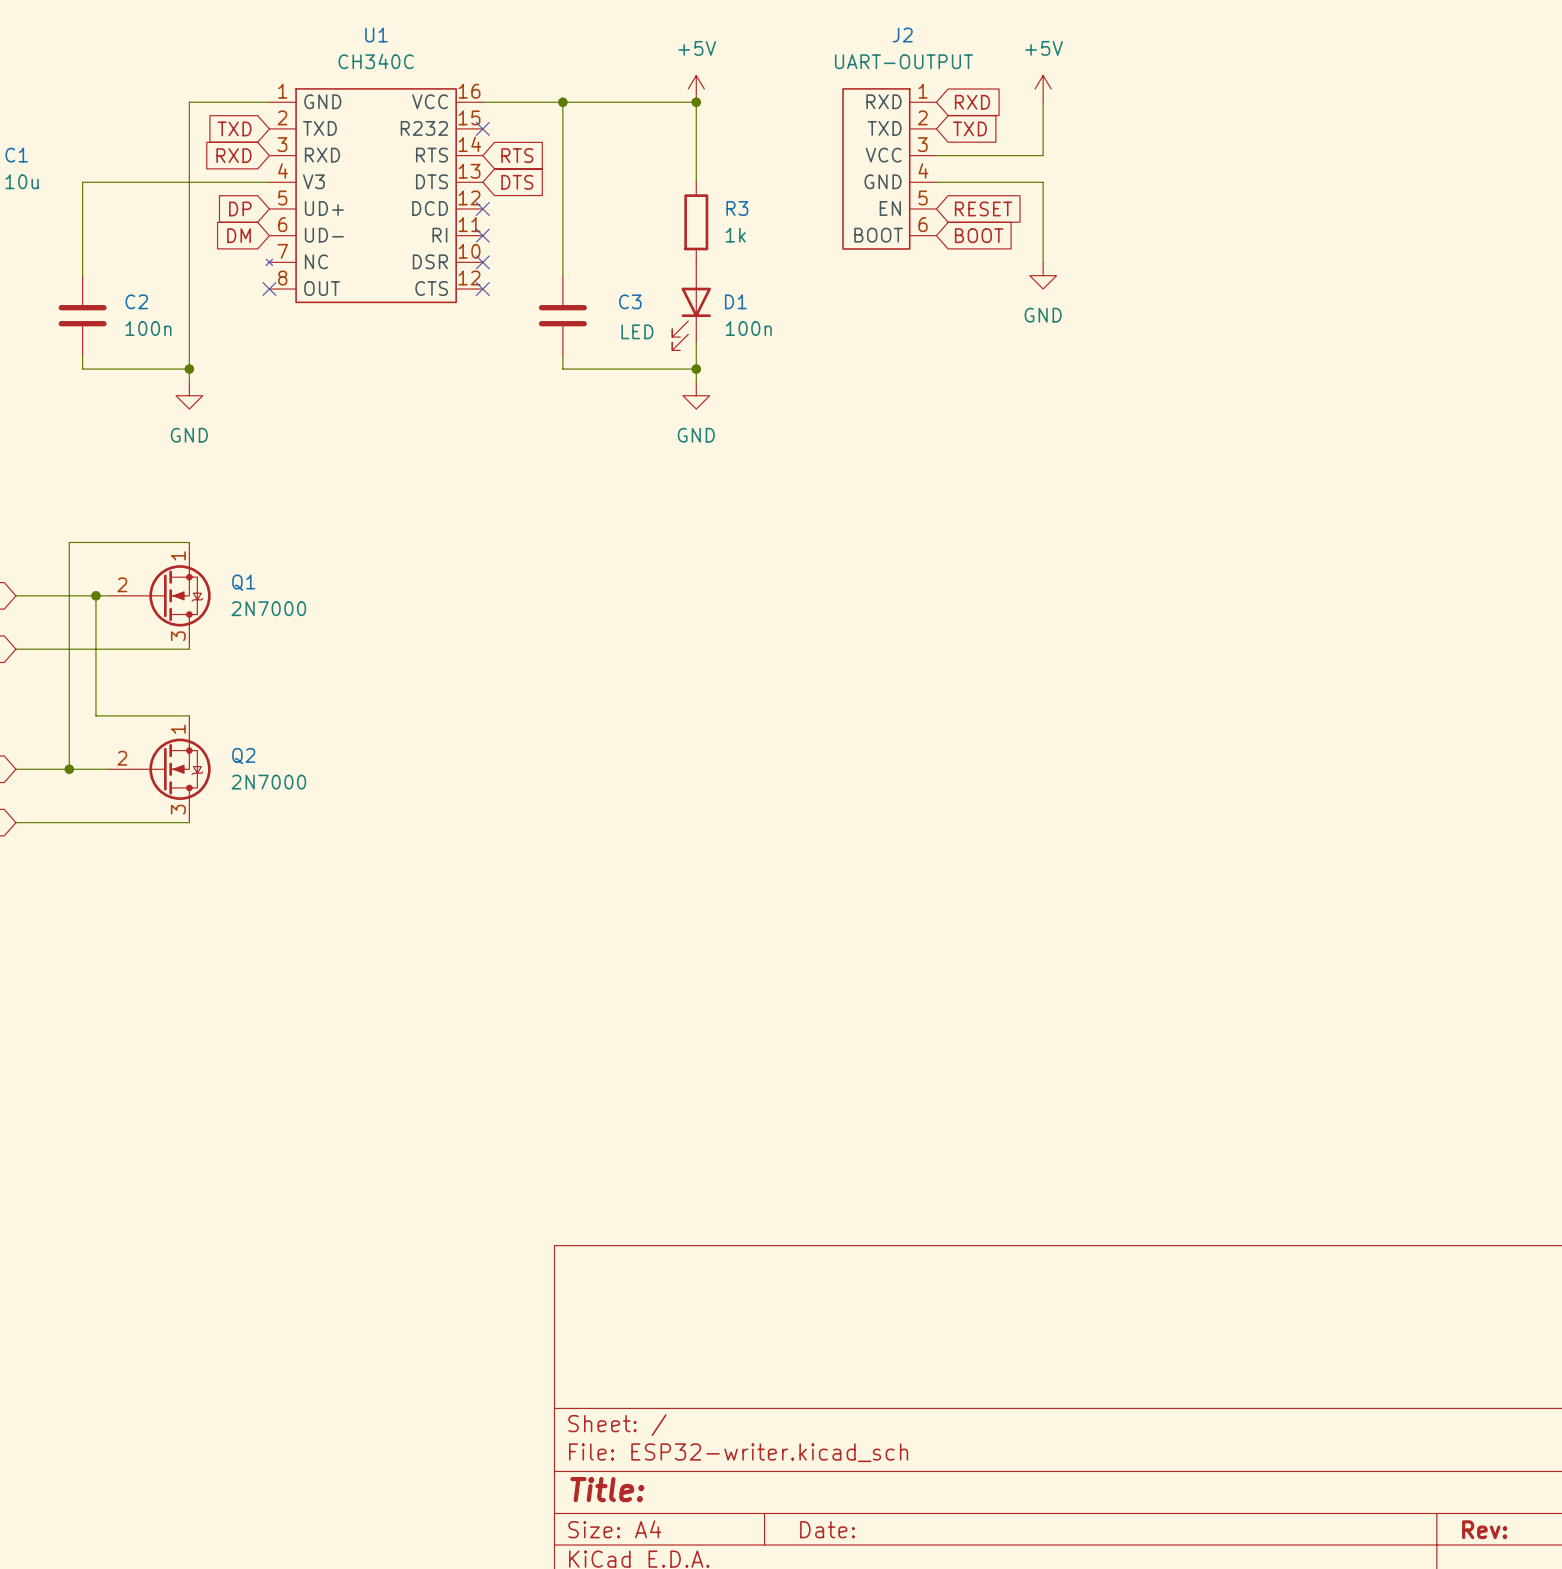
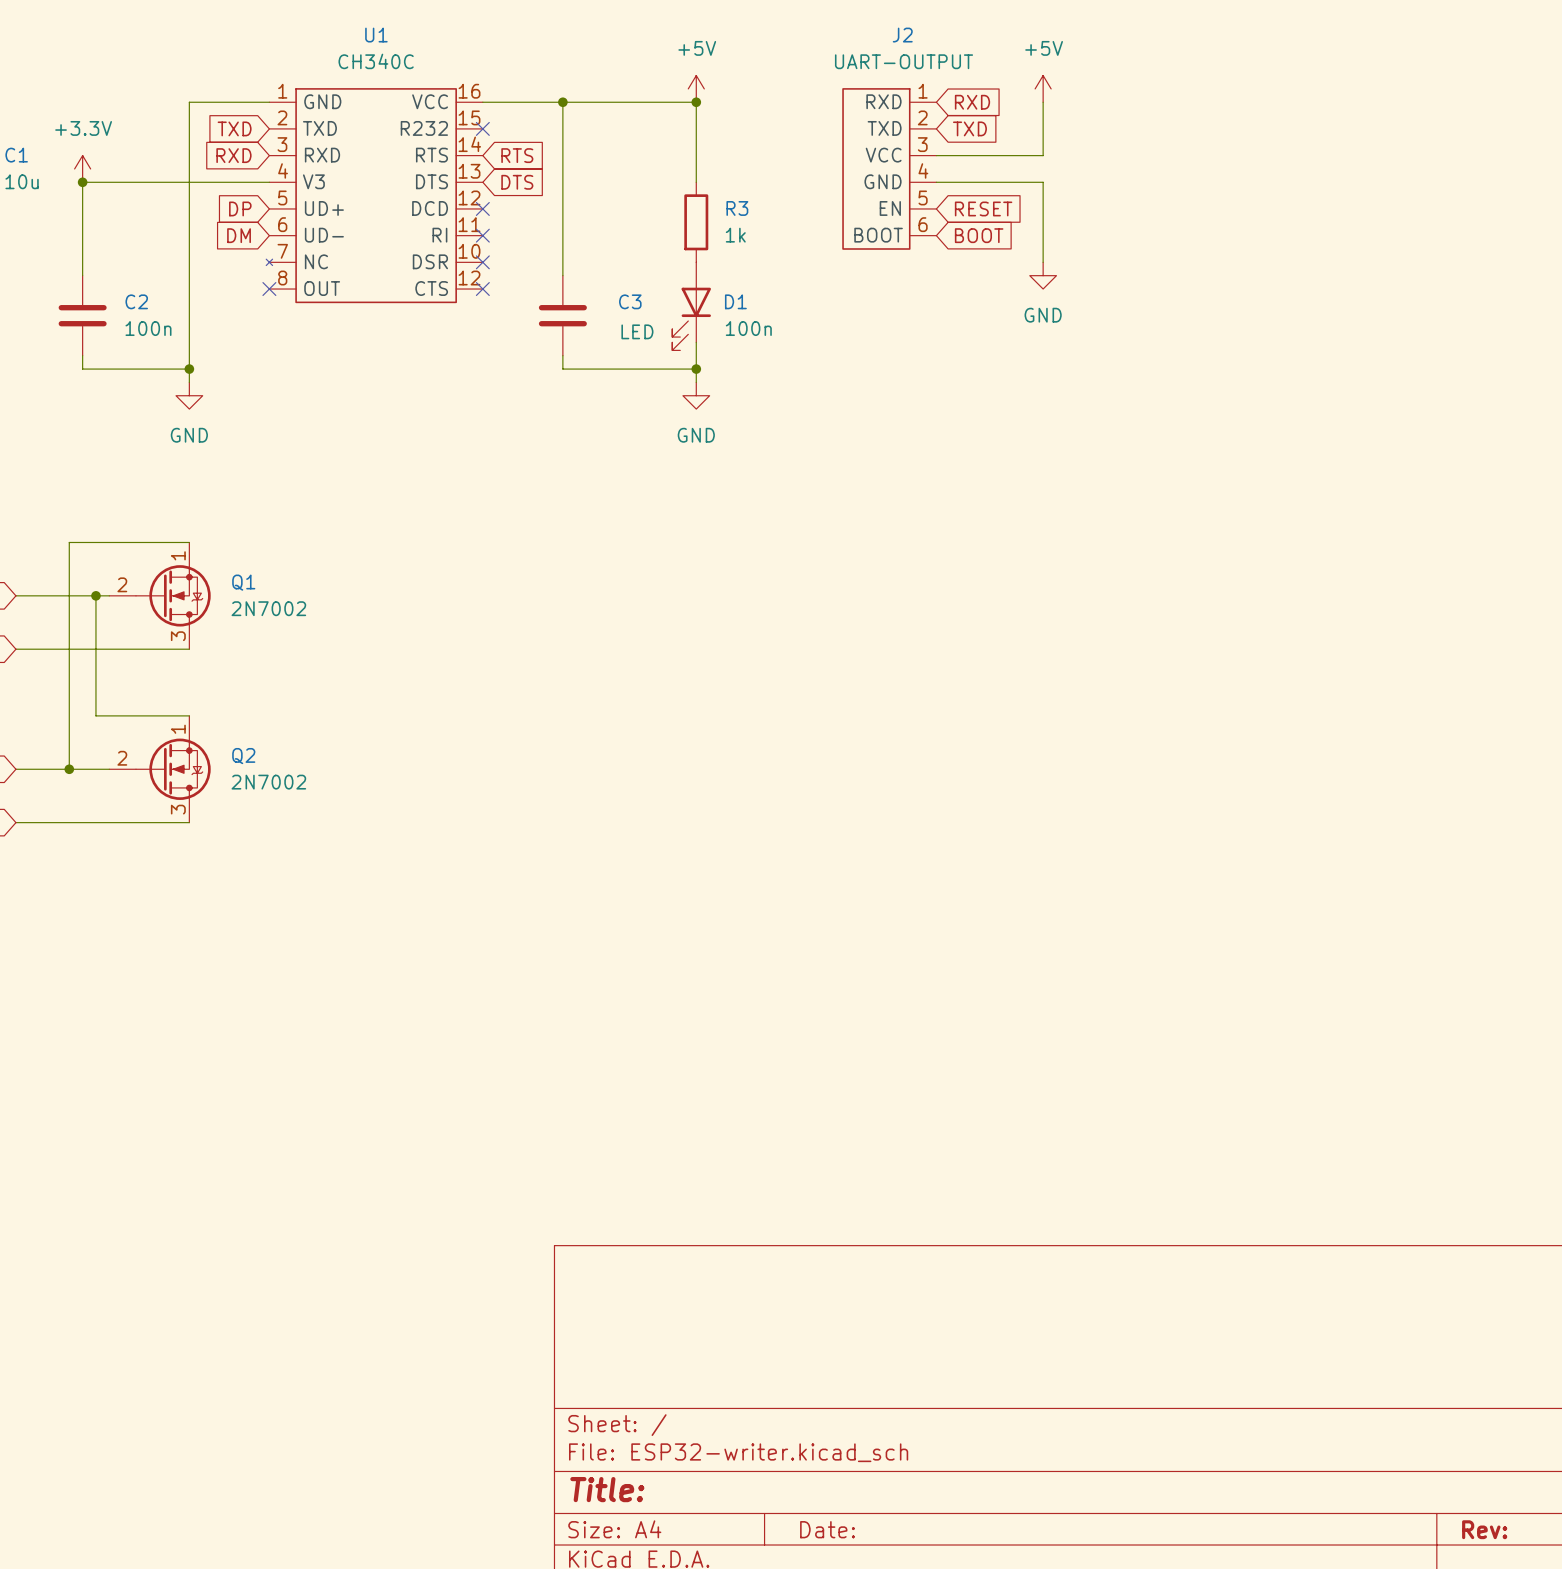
power symbol: none -> +3.3V (82, 168)
junction: none -> (82, 182)
Q1 value: 2N7000 (268, 608) -> 2N7002 (268, 608)
Q2 value: 2N7000 (268, 782) -> 2N7002 (268, 782)

